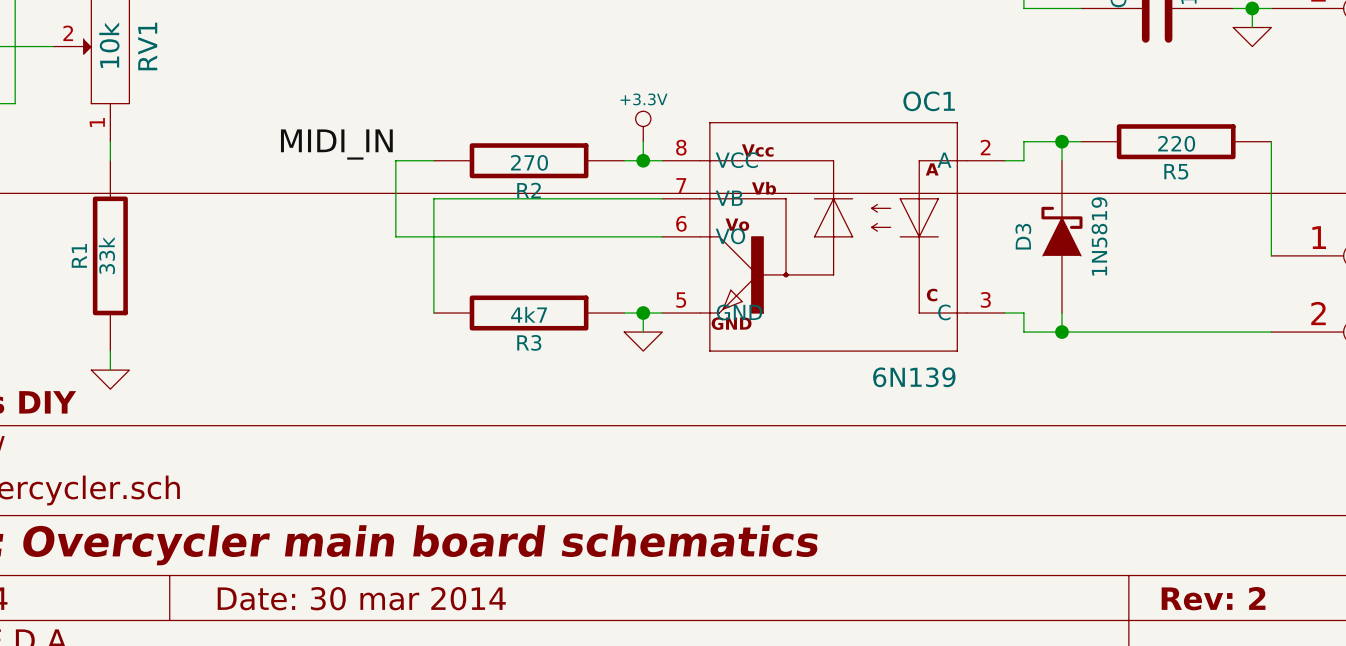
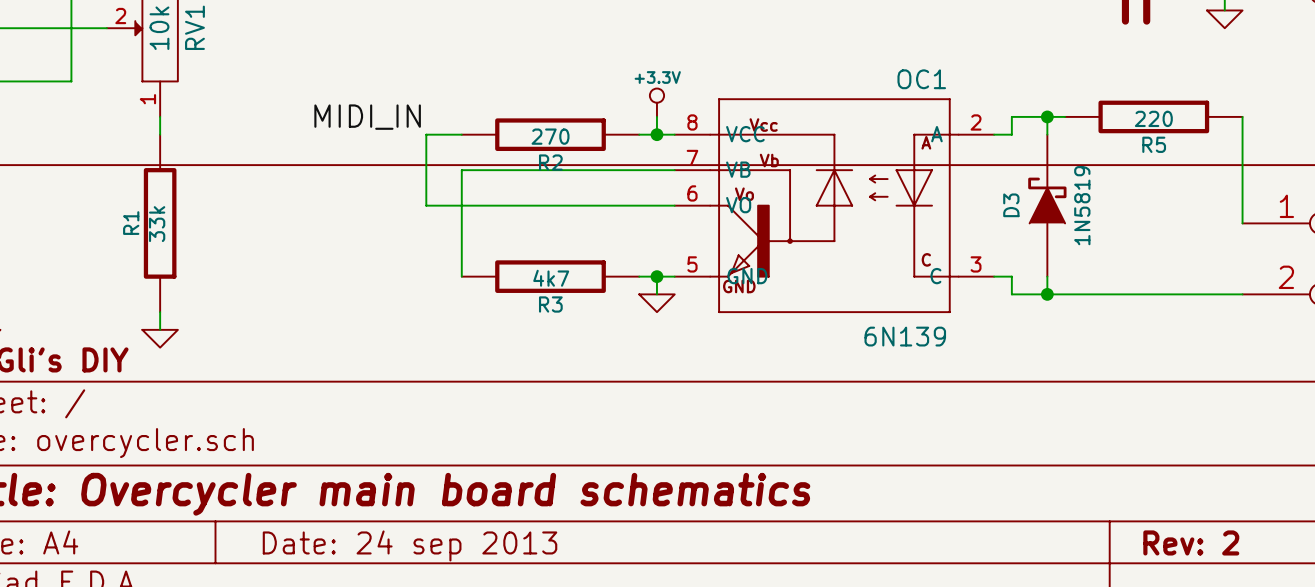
title block: Date: 30 mar 2014 (361, 598) -> Date: 24 sep 2013 (410, 545)

